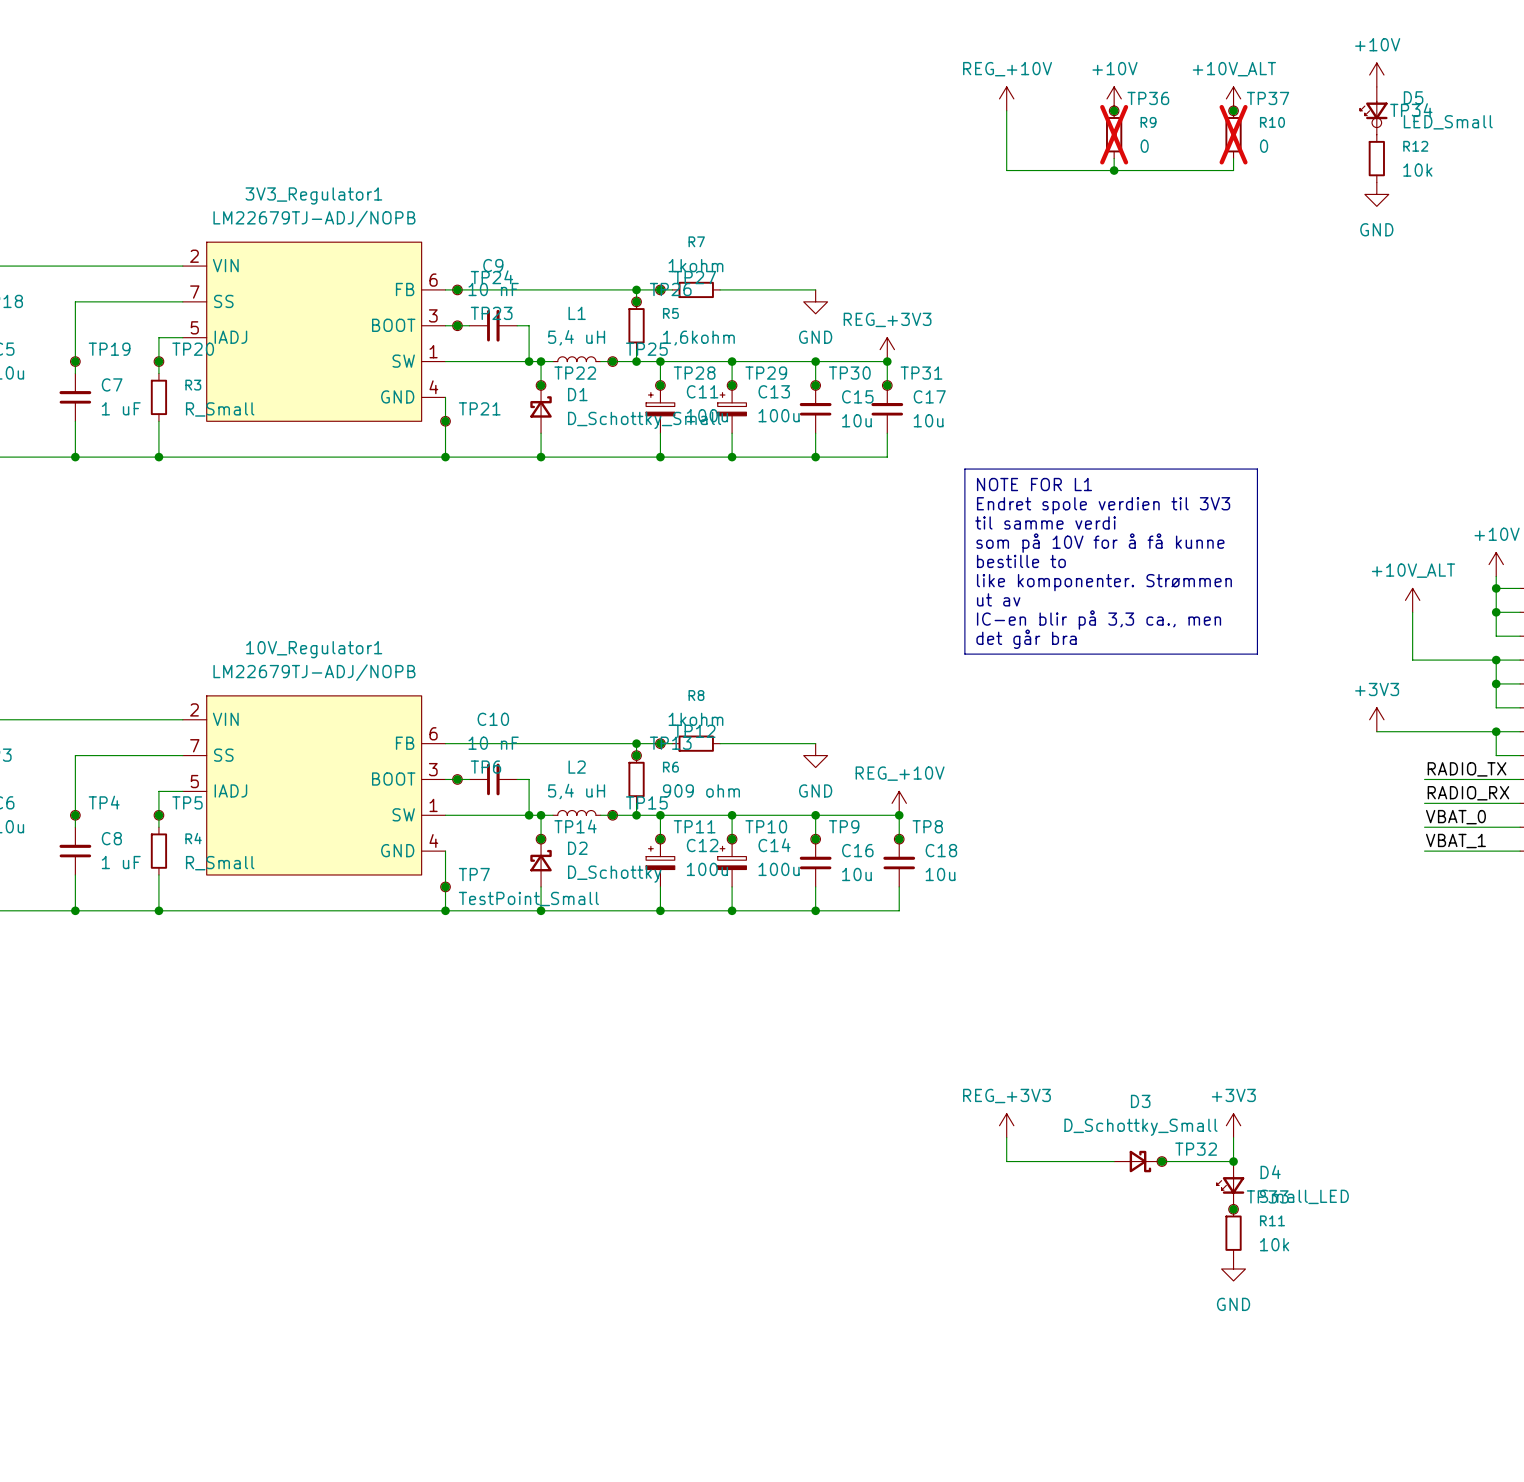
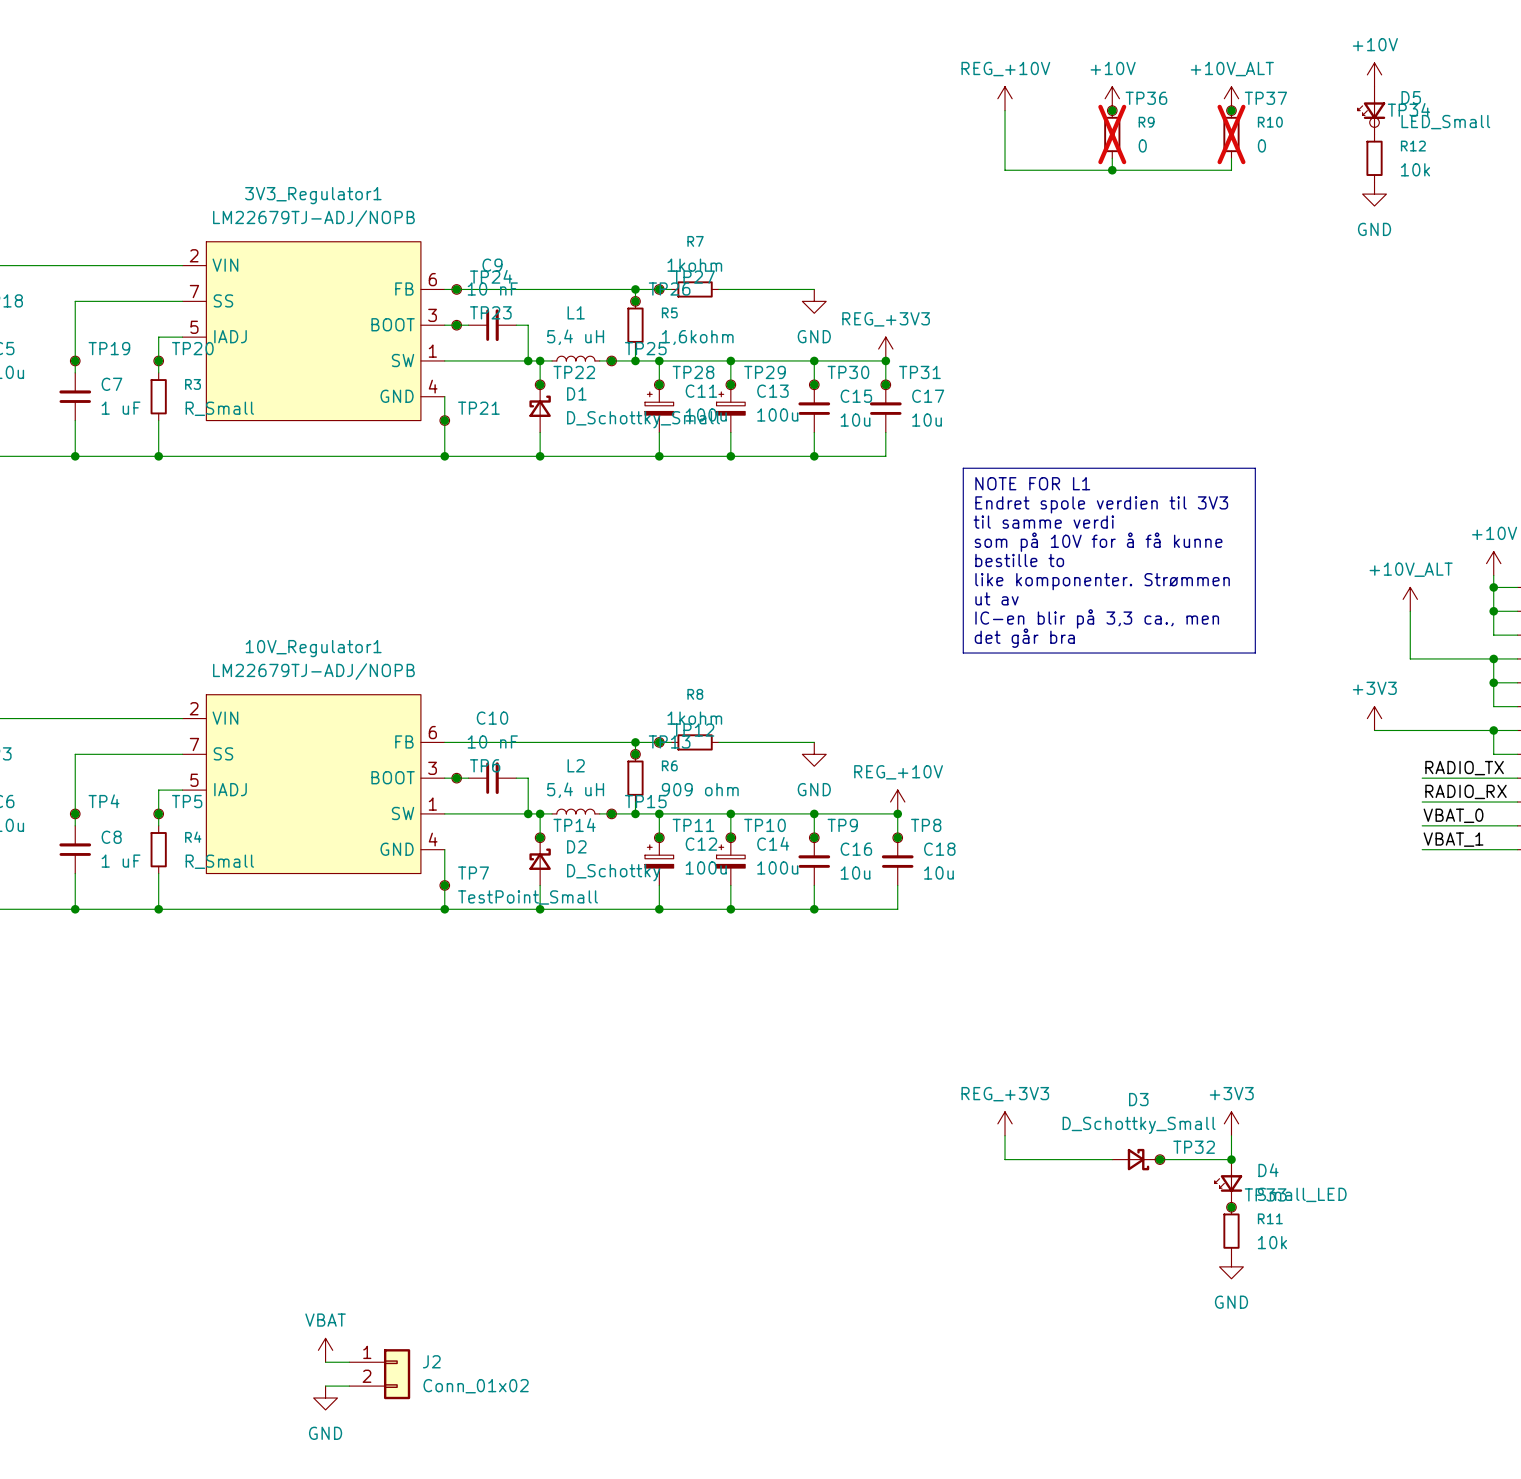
power symbol: none -> VBAT (325, 1350)
wire: none -> (325, 1362) (349, 1362)
J2: none -> Conn_01x02 (379, 1374)
wire: none -> (325, 1386) (349, 1386)
power symbol: none -> GND (325, 1398)

